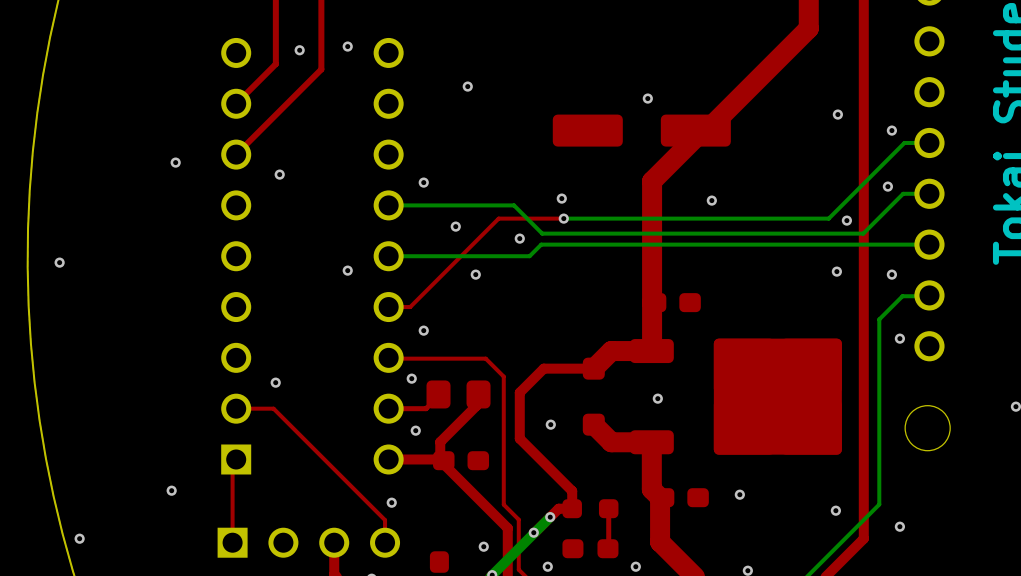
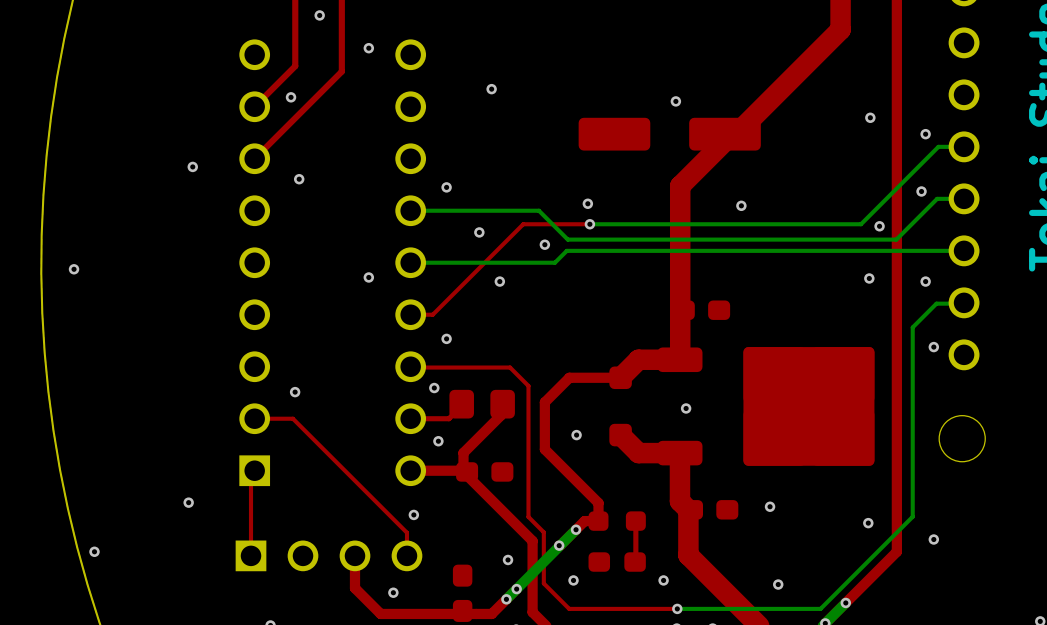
via: none -> (319, 15)
via: (299, 50) -> none
via: none -> (291, 97)

